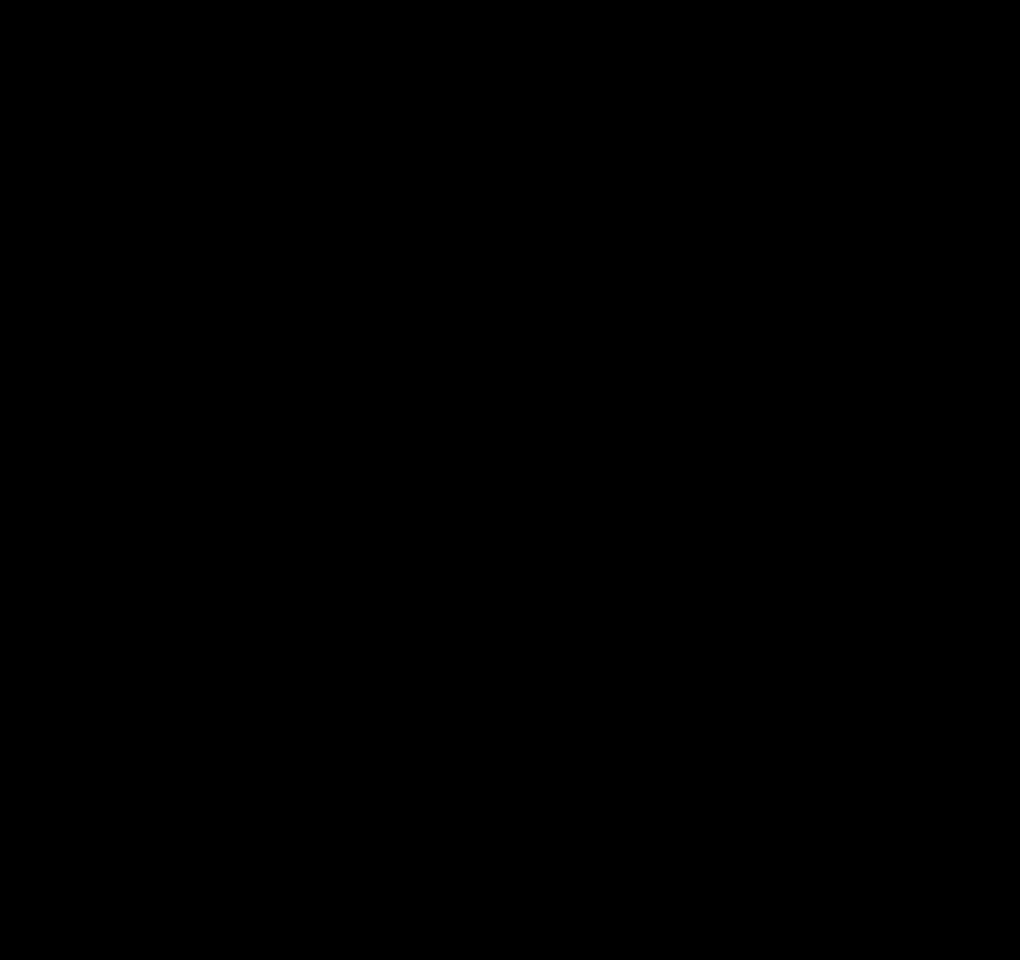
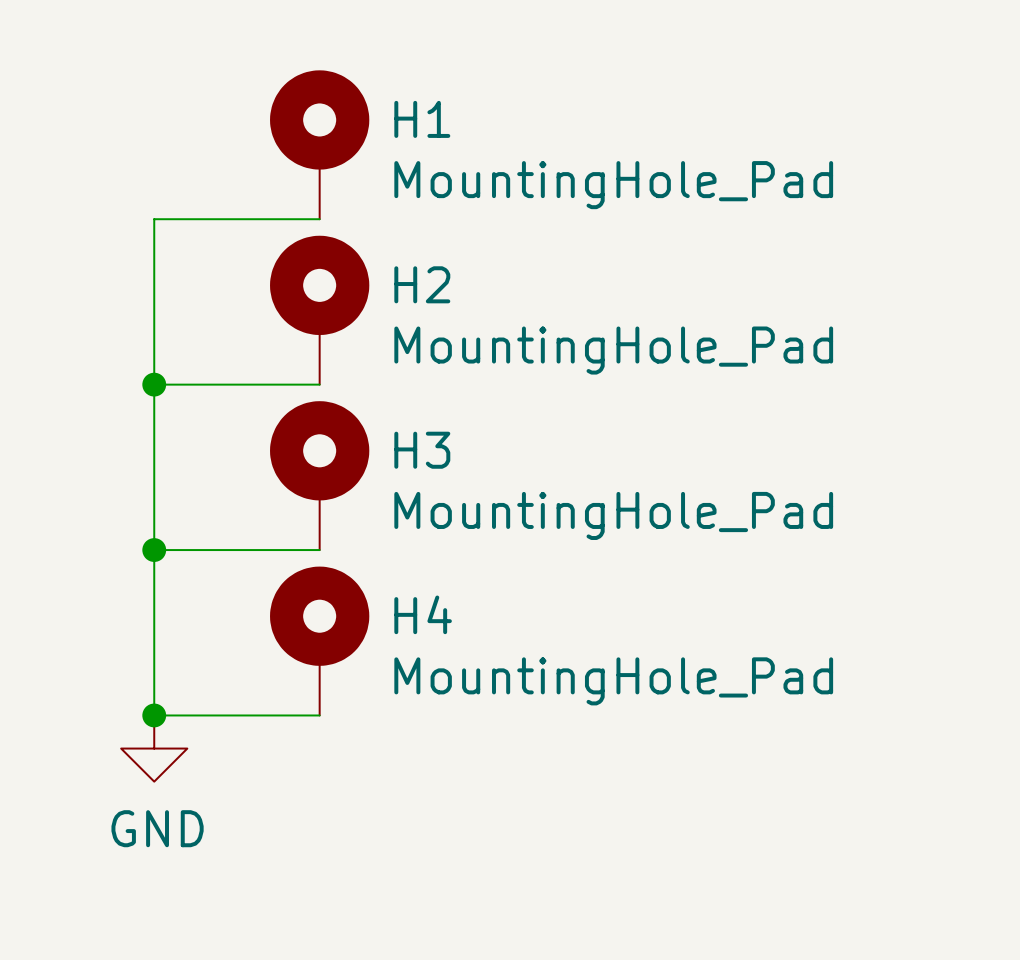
H1: none -> MountingHole_Pad (319, 144)
wire: none -> (319, 219) (154, 219) (154, 715) (319, 715)
H2: none -> MountingHole_Pad (319, 310)
wire: none -> (154, 384) (319, 384)
junction: none -> (154, 384)
H3: none -> MountingHole_Pad (319, 475)
wire: none -> (154, 550) (319, 550)
junction: none -> (154, 550)
H4: none -> MountingHole_Pad (319, 641)
junction: none -> (154, 715)
power symbol: none -> GND (154, 748)

